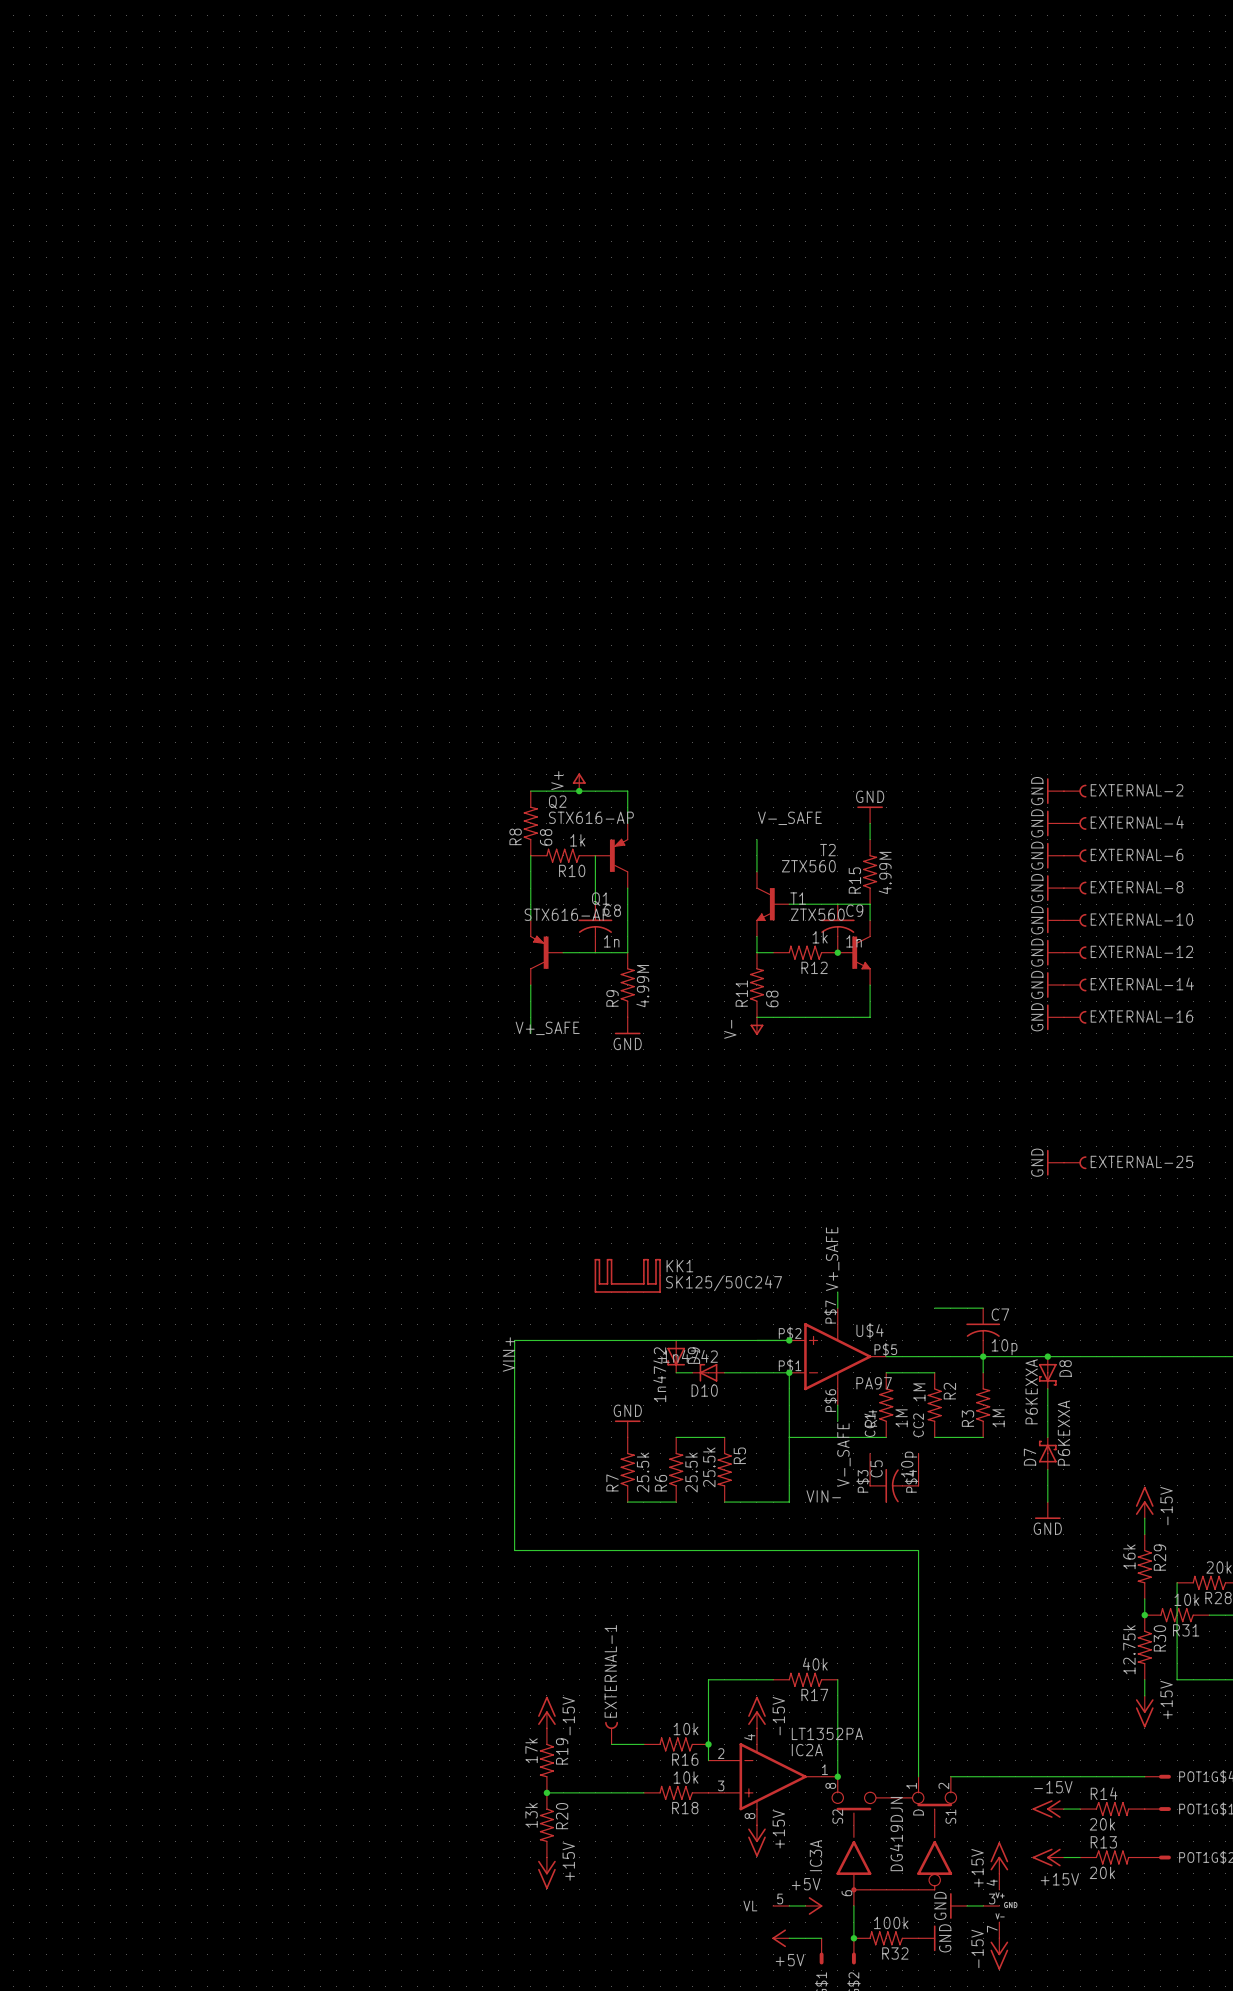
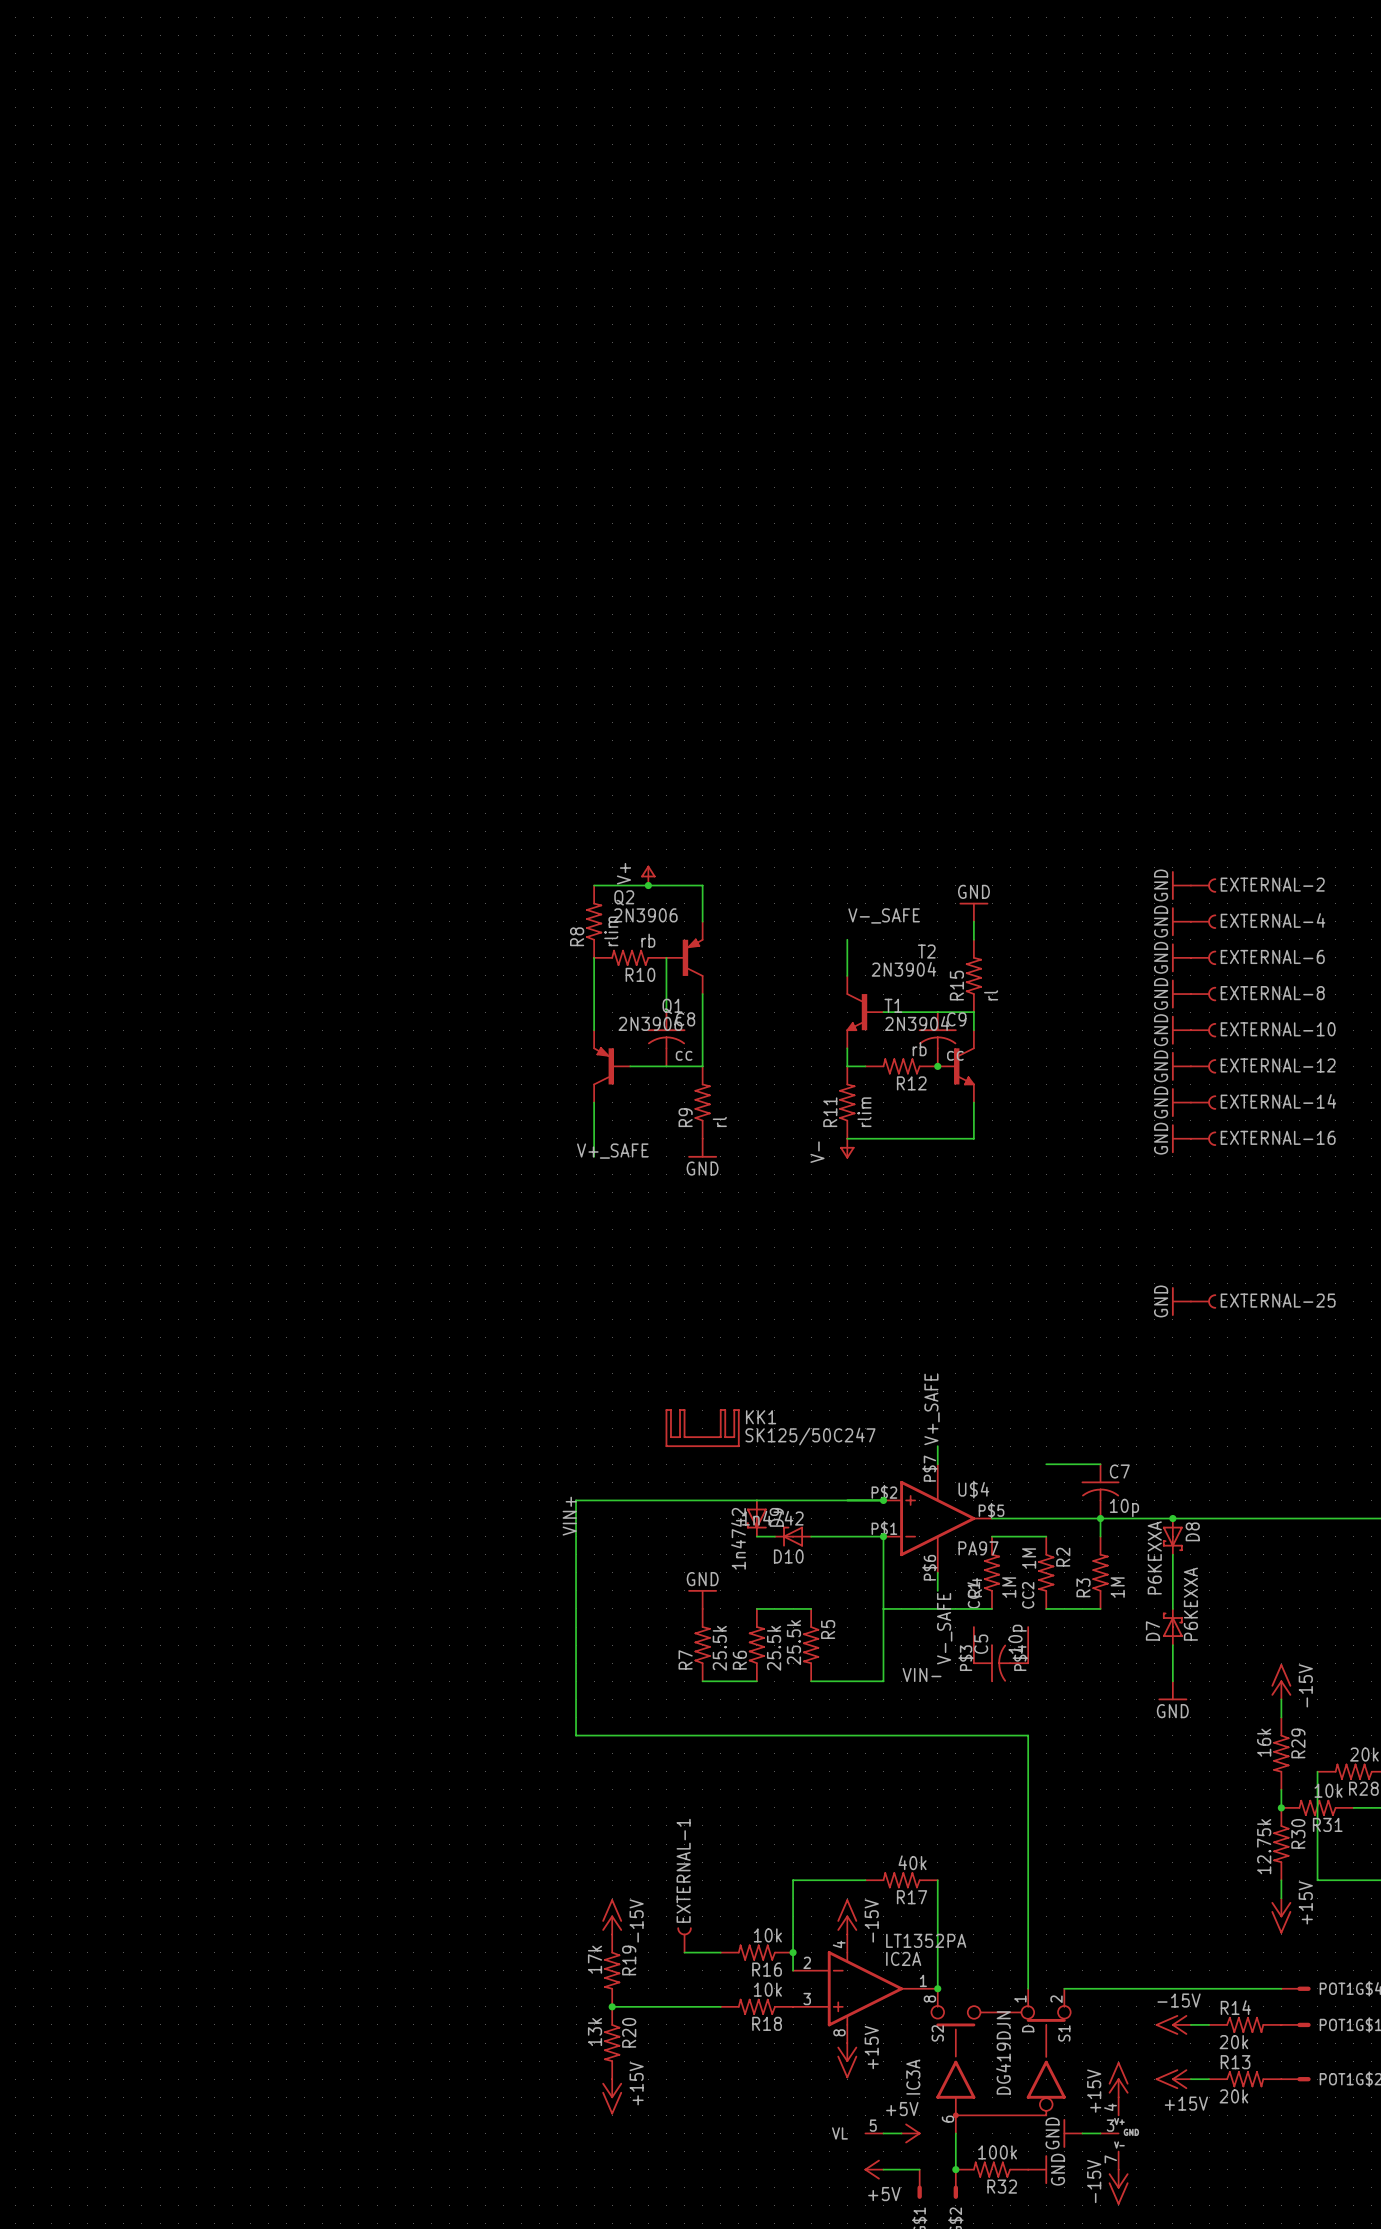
Q2 value: STX616-AP (591, 817) -> 2N3906 (645, 915)
R8 value: 68 (546, 837) -> rlim (611, 931)
R10 value: 1k (577, 840) -> rb (648, 940)
T2 value: ZTX560 (808, 866) -> 2N3904 (903, 969)
R15 value: 4.99M (885, 873) -> rl (991, 995)
Q1 value: STX616-AP (567, 914) -> 2N3906 (650, 1023)
T1 value: ZTX560 (817, 914) -> 2N3904 (917, 1023)
R12 value: 1k (820, 937) -> rb (919, 1049)
C8 value: 1n (611, 941) -> cc (684, 1055)
C9 value: 1n (854, 941) -> cc (955, 1055)
R9 value: 4.99M (642, 986) -> rl (719, 1121)
R11 value: 68 (772, 998) -> rlim (864, 1112)

